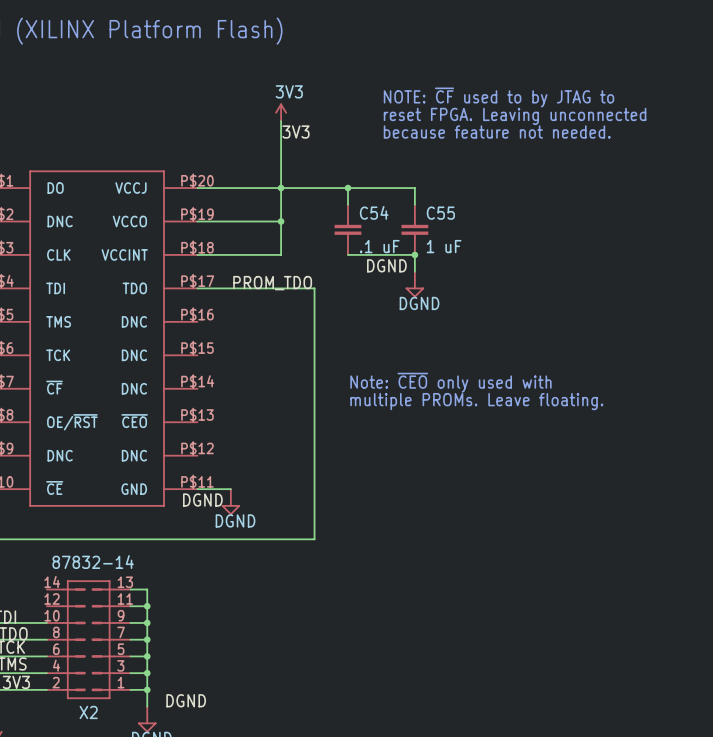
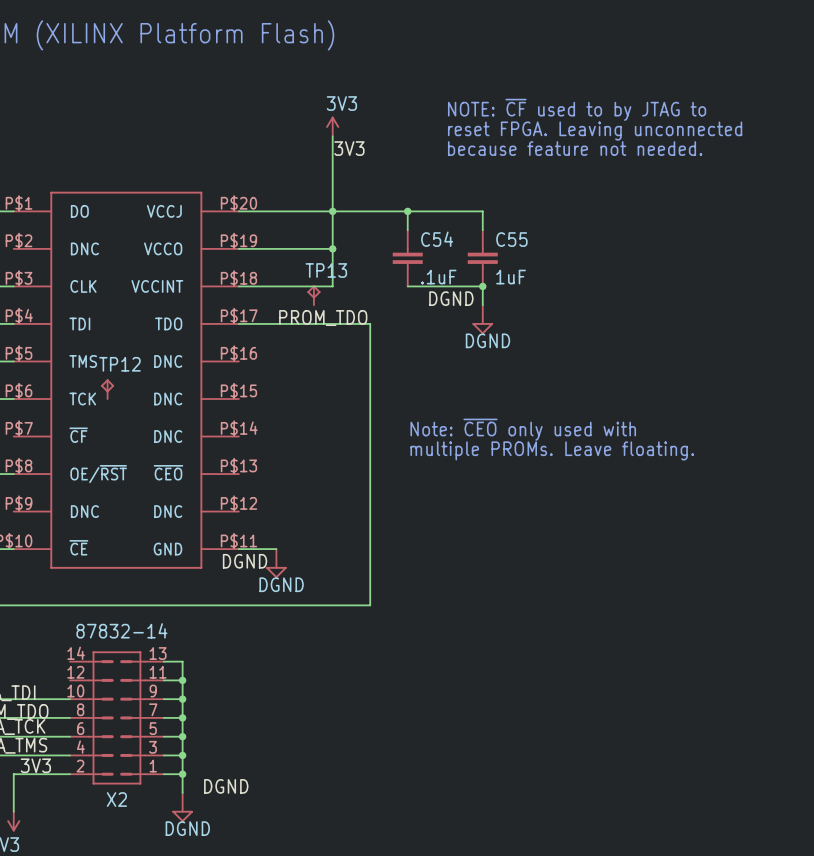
C54 value: .1 uF (379, 246) -> .1uF (438, 277)
C55 value: 1 uF (444, 246) -> 1uF (511, 277)
TP13: none -> (313, 295)
TP12: none -> (107, 389)

